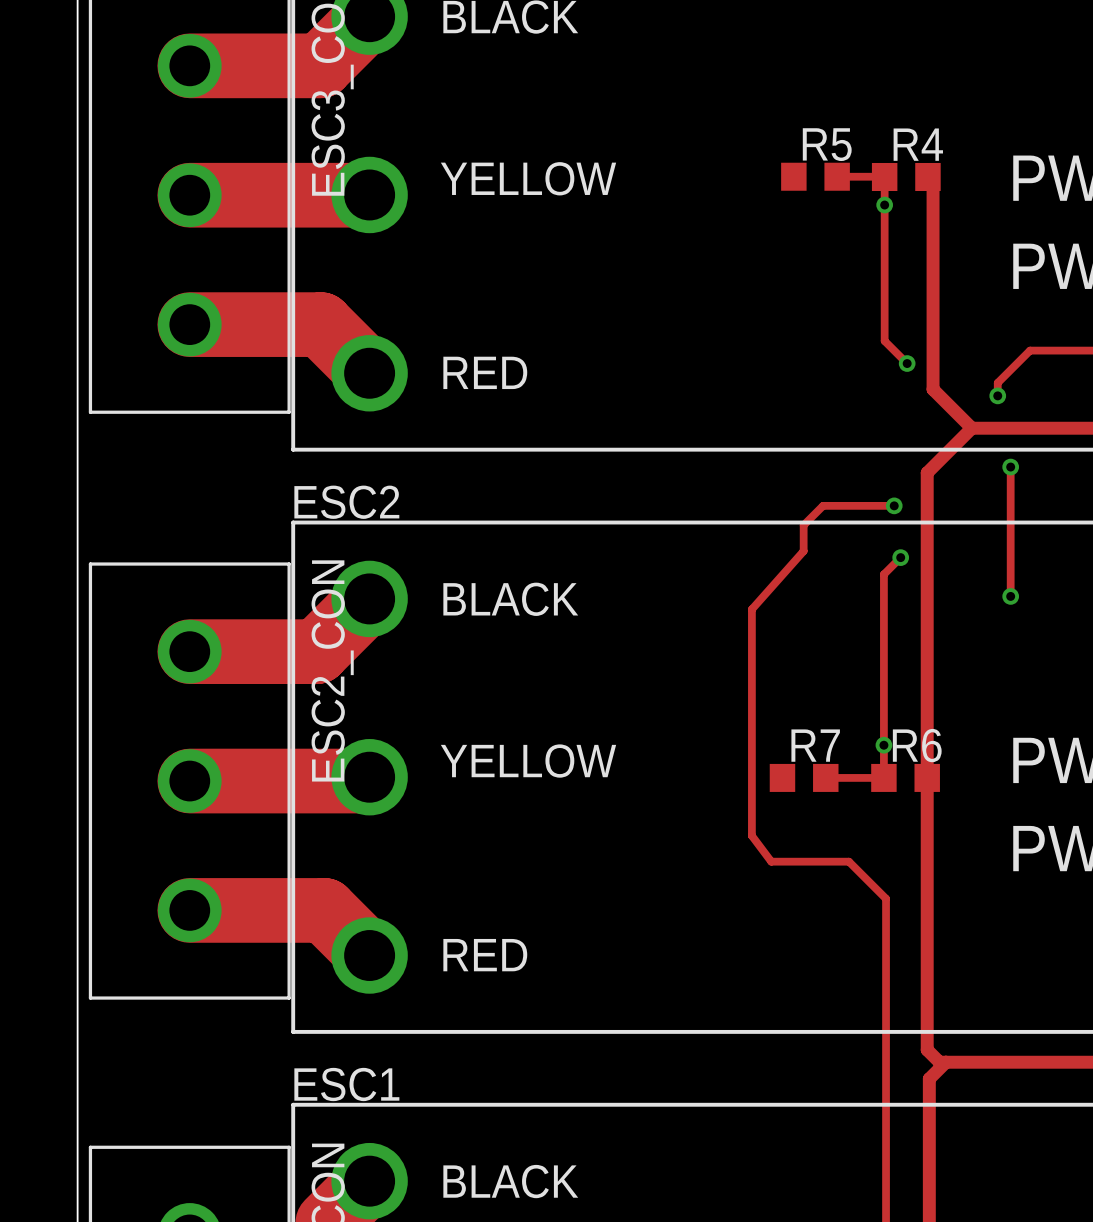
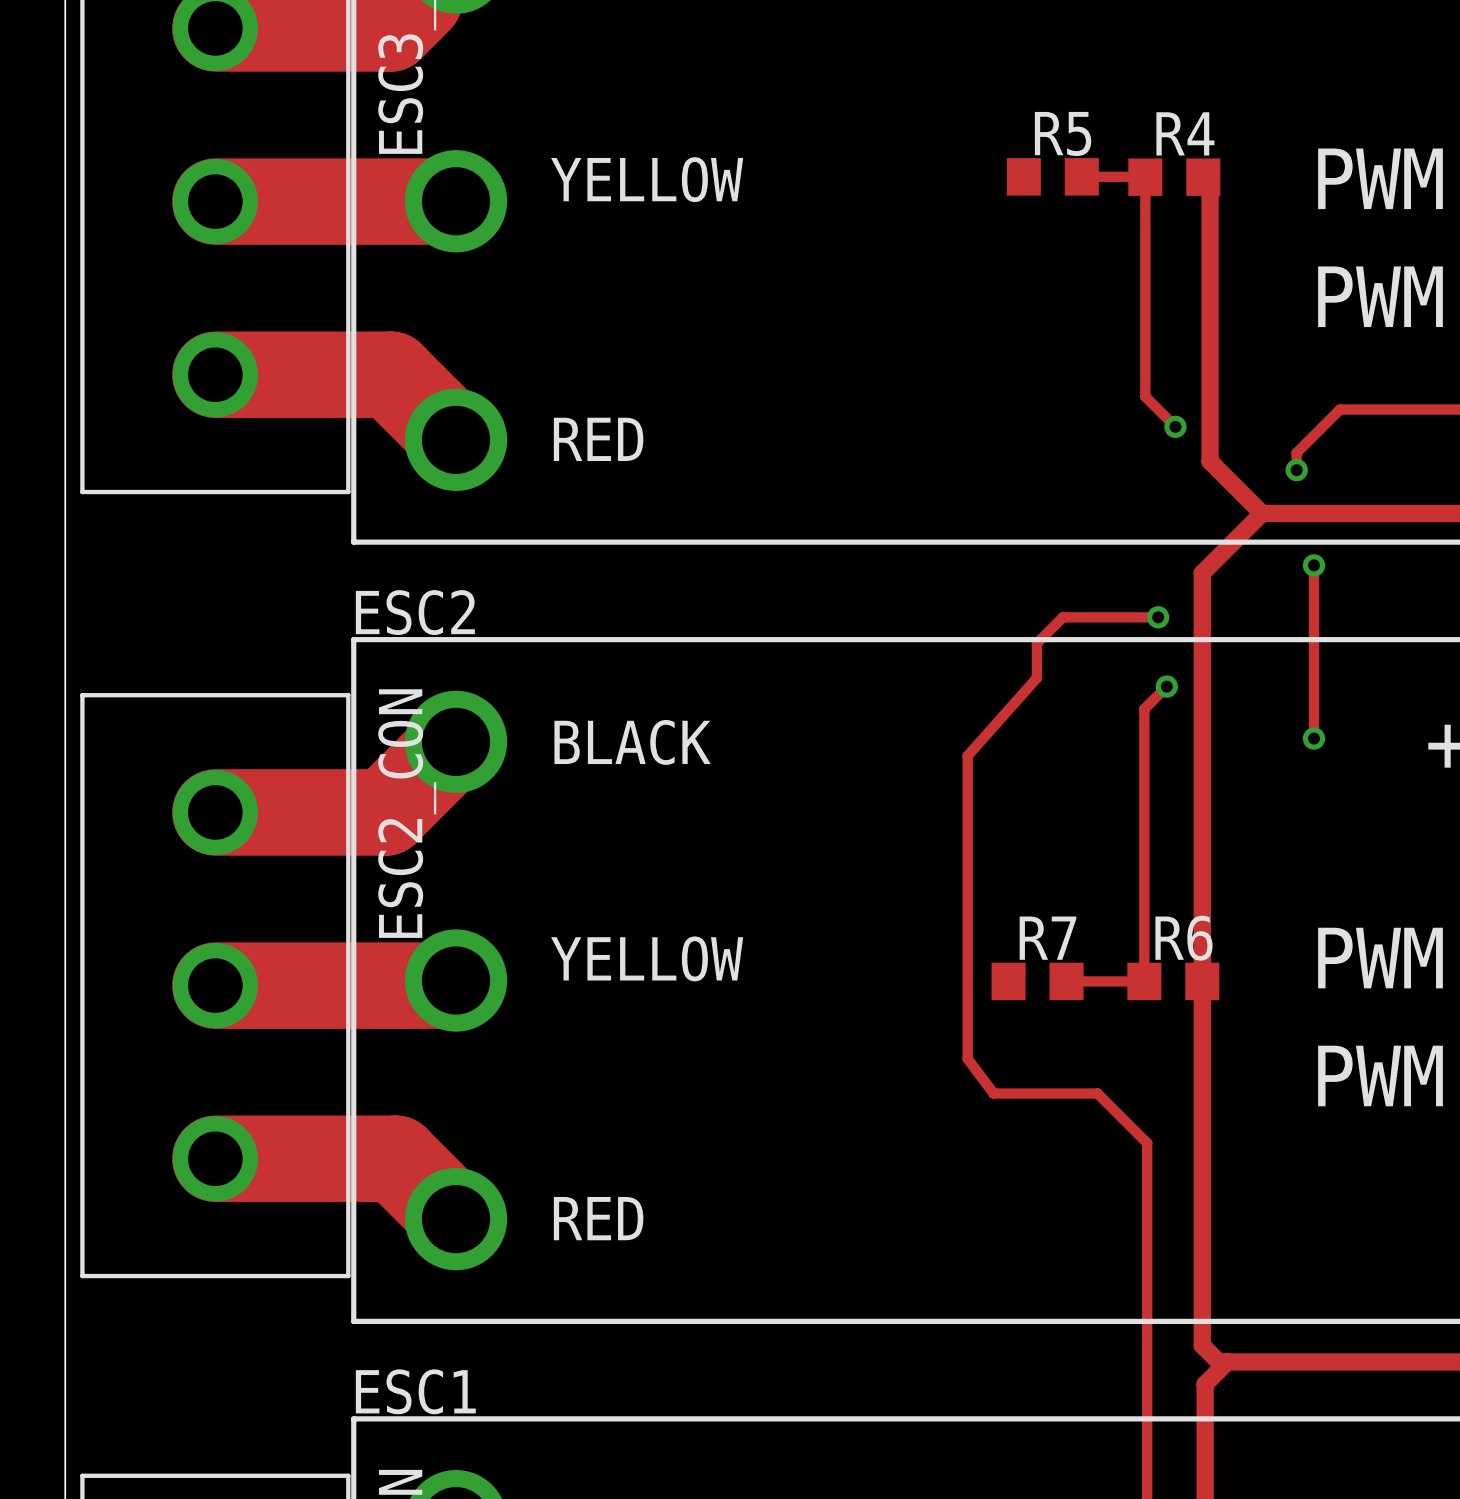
via: (884, 205) -> none
via: (883, 745) -> none

